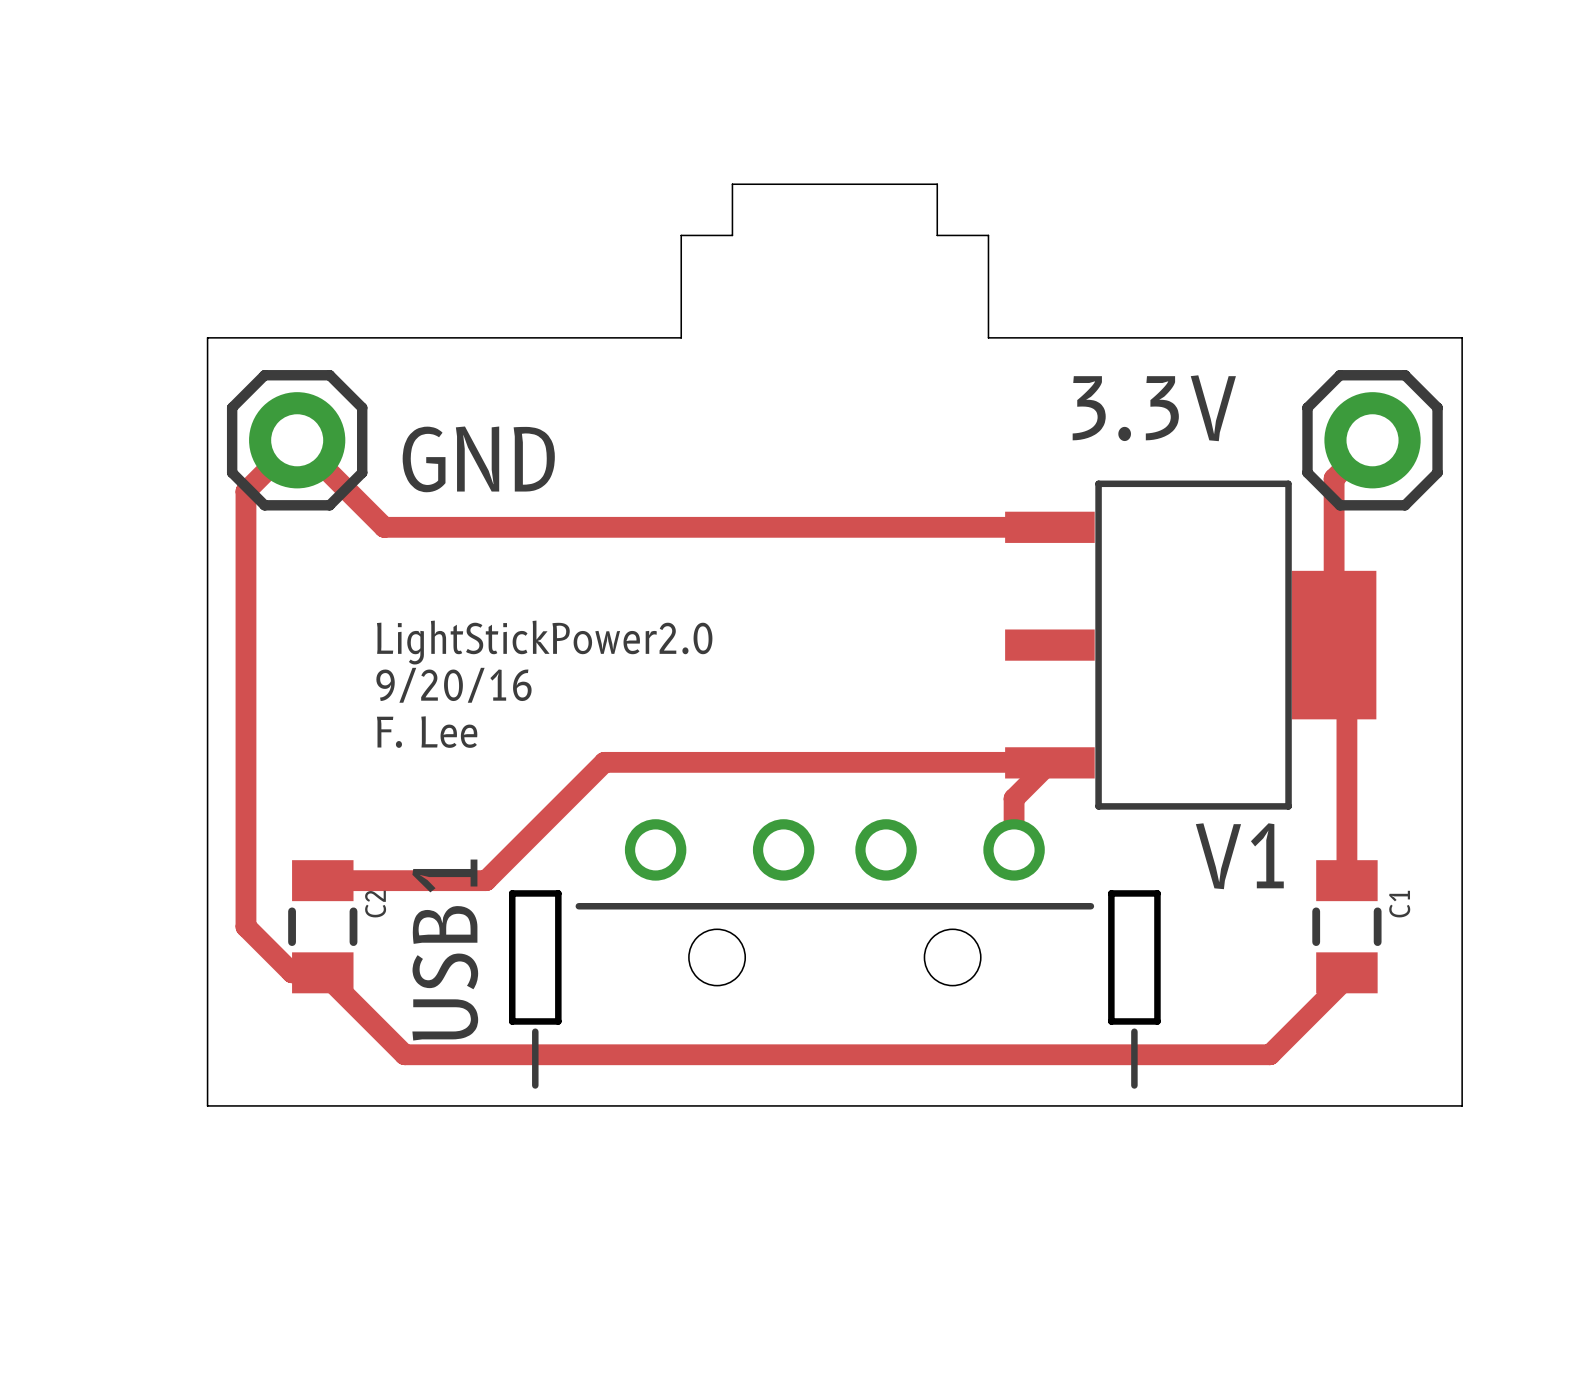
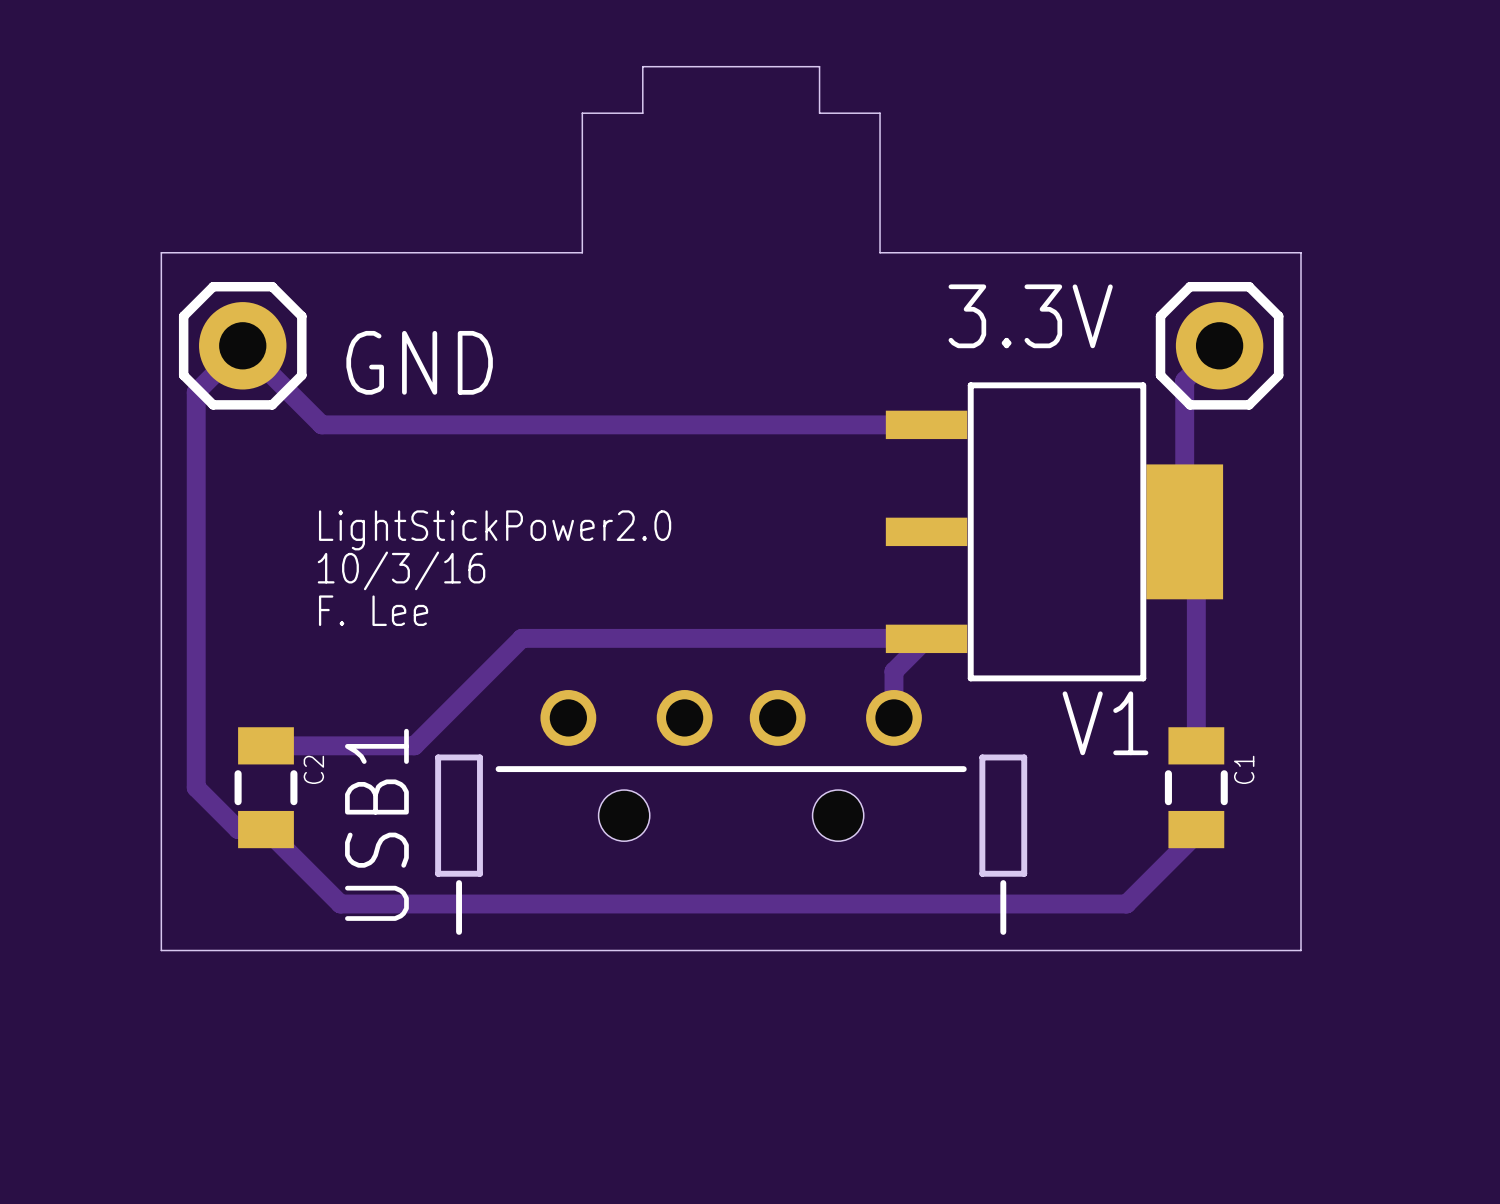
board edge: (732, 184) (732, 235) (681, 235) (681, 337) (670, 337) -> (638, 113) (582, 113) (582, 252)
board edge: (737, 184) (932, 184) -> (642, 113) (642, 66) (819, 66) (819, 113)
board edge: (937, 184) (937, 235) (988, 235) (988, 337) (998, 337) -> (824, 113) (880, 113) (880, 252)
text: 9/20/16 (453, 685) -> 10/3/16 (401, 570)

